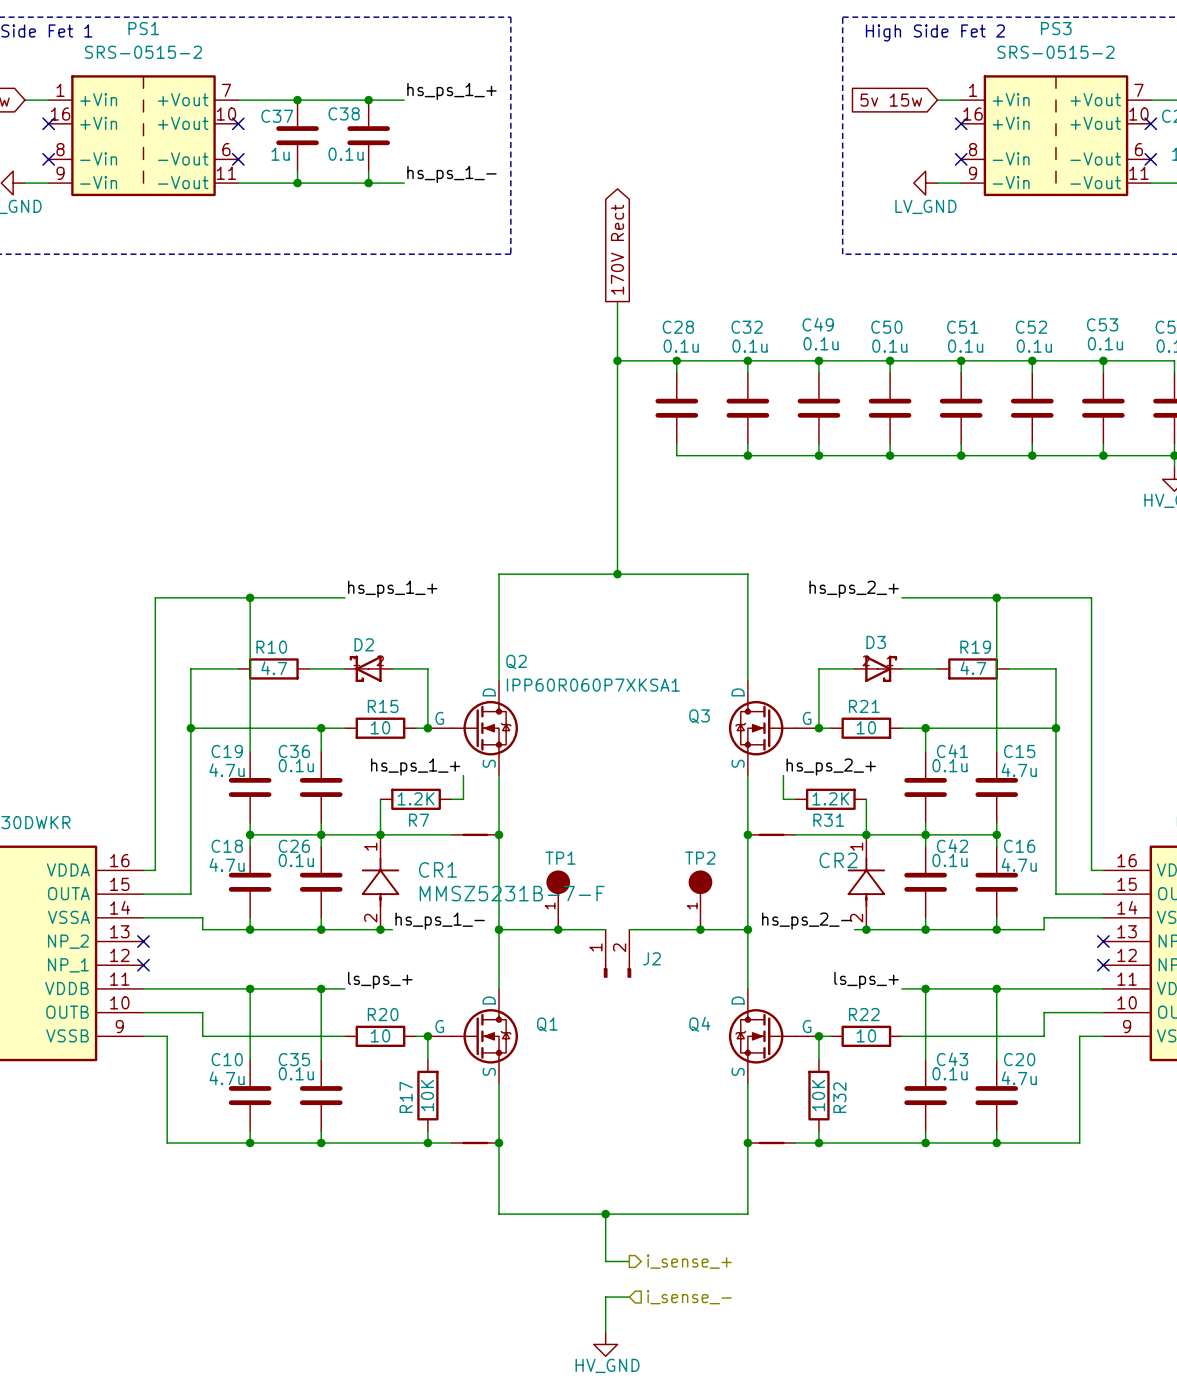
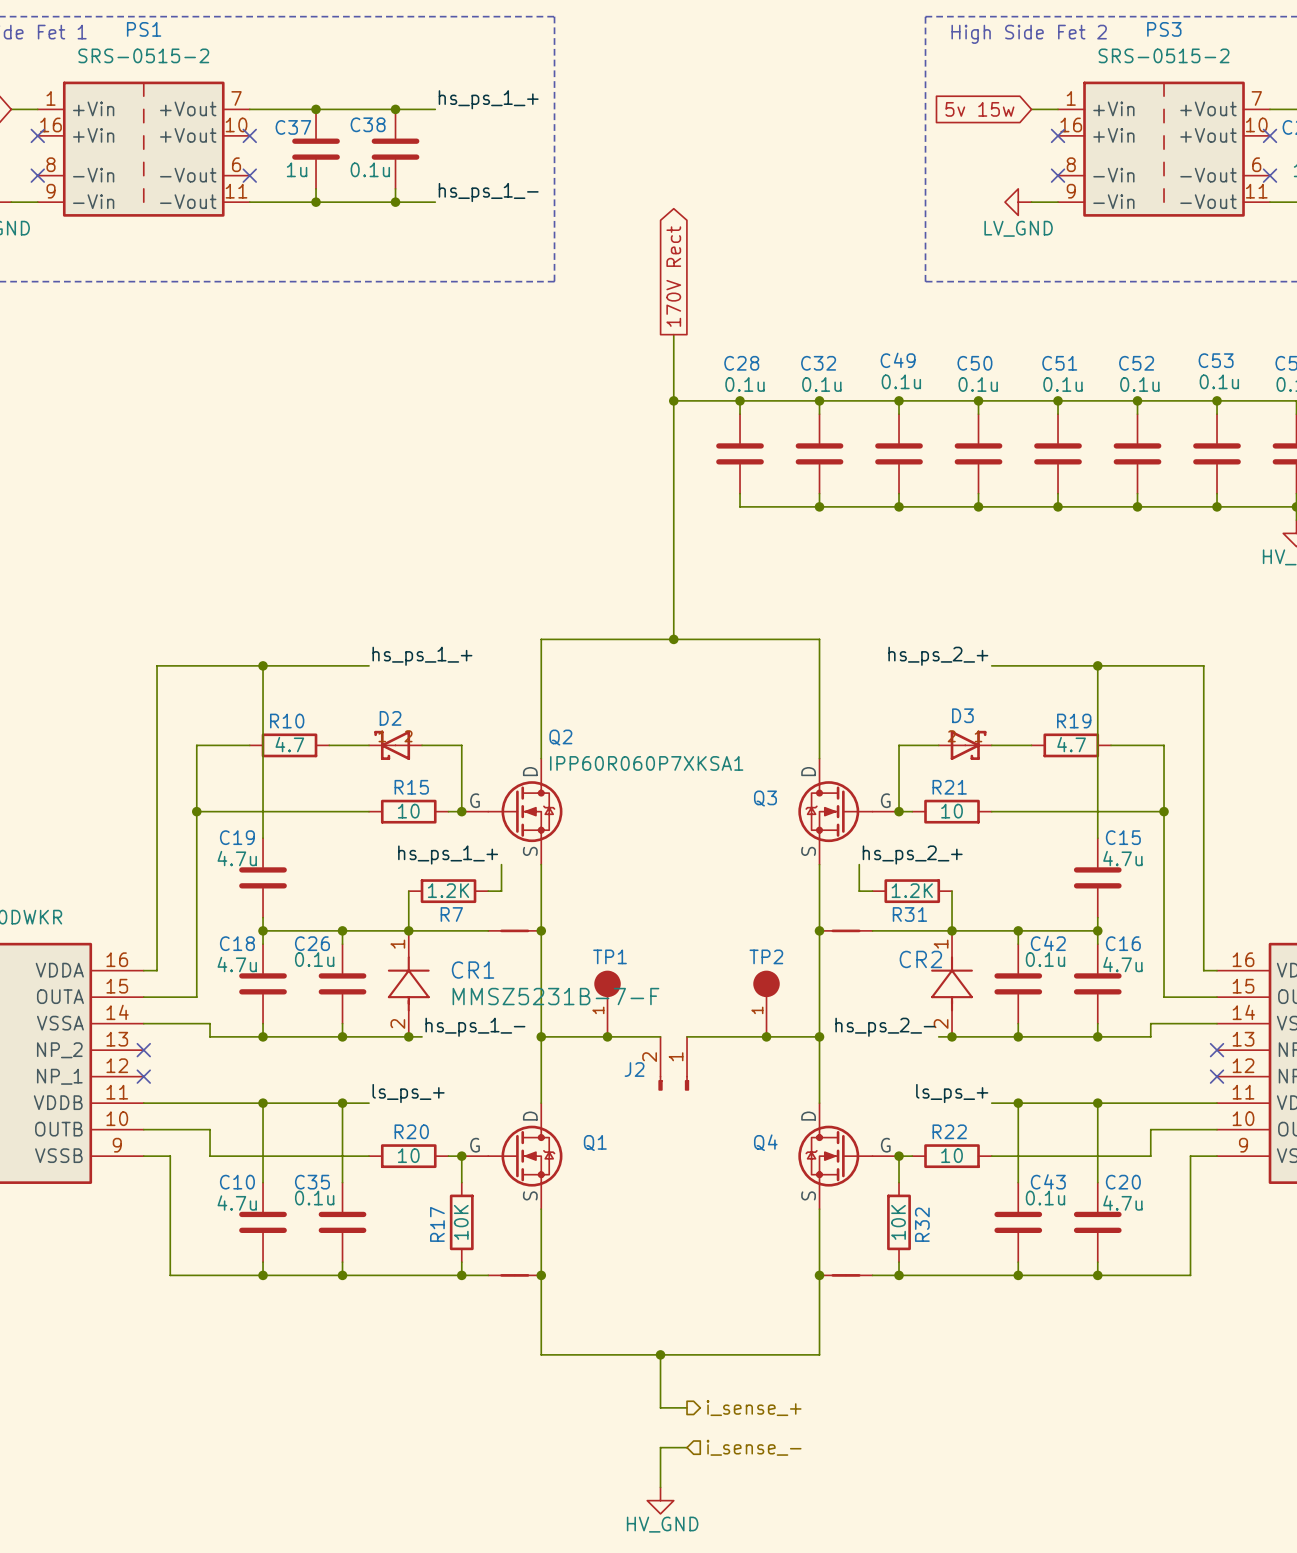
wire: (321, 728) (321, 751) -> none
junction: (321, 728) -> none
wire: (925, 728) (925, 751) -> none
junction: (925, 728) -> none
C36: 0.1u (321, 787) -> none
C41: 0.1u (925, 787) -> none
wire: (321, 823) (321, 834) -> none
wire: (925, 823) (925, 834) -> none
J2 flip: as is (617, 971) -> left-right (673, 1083)

